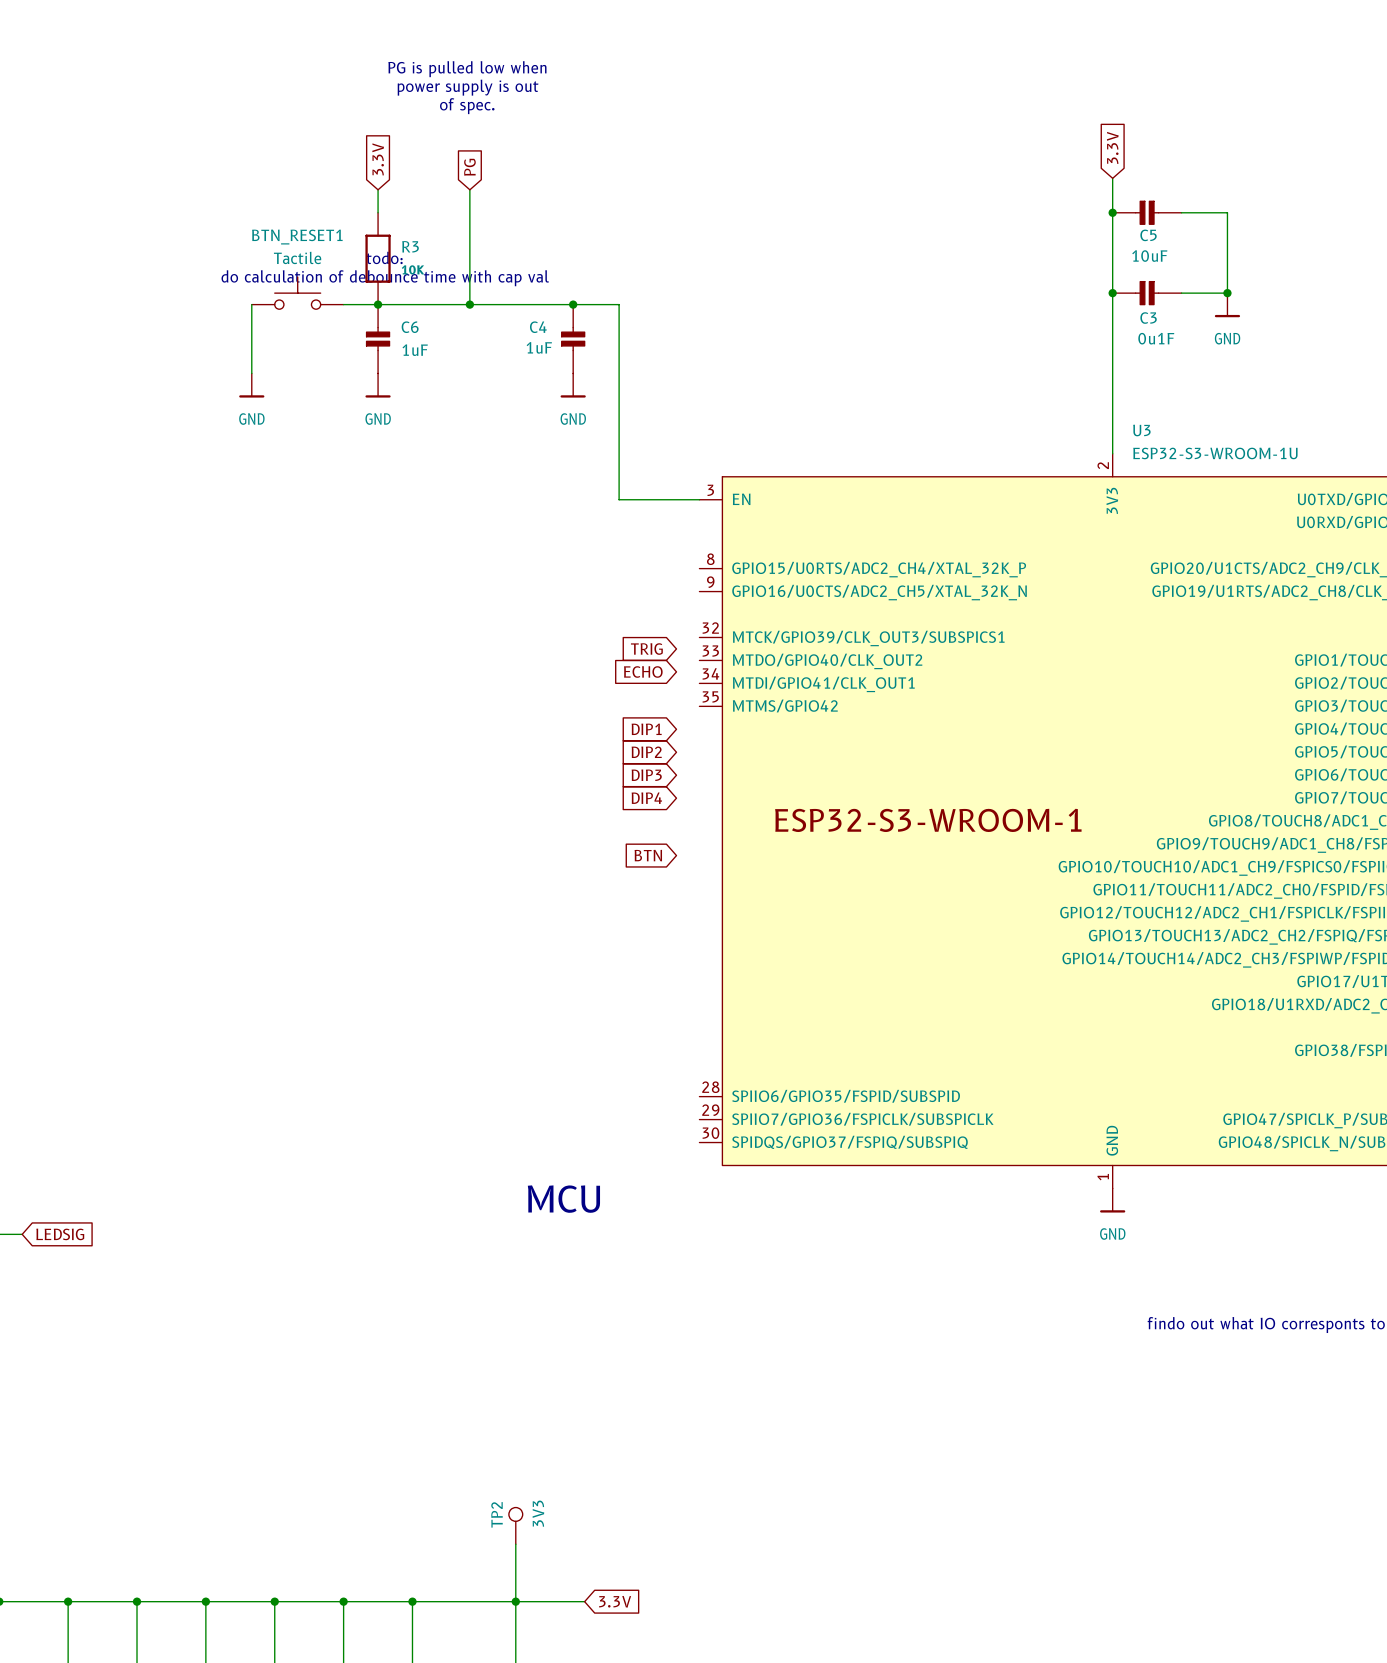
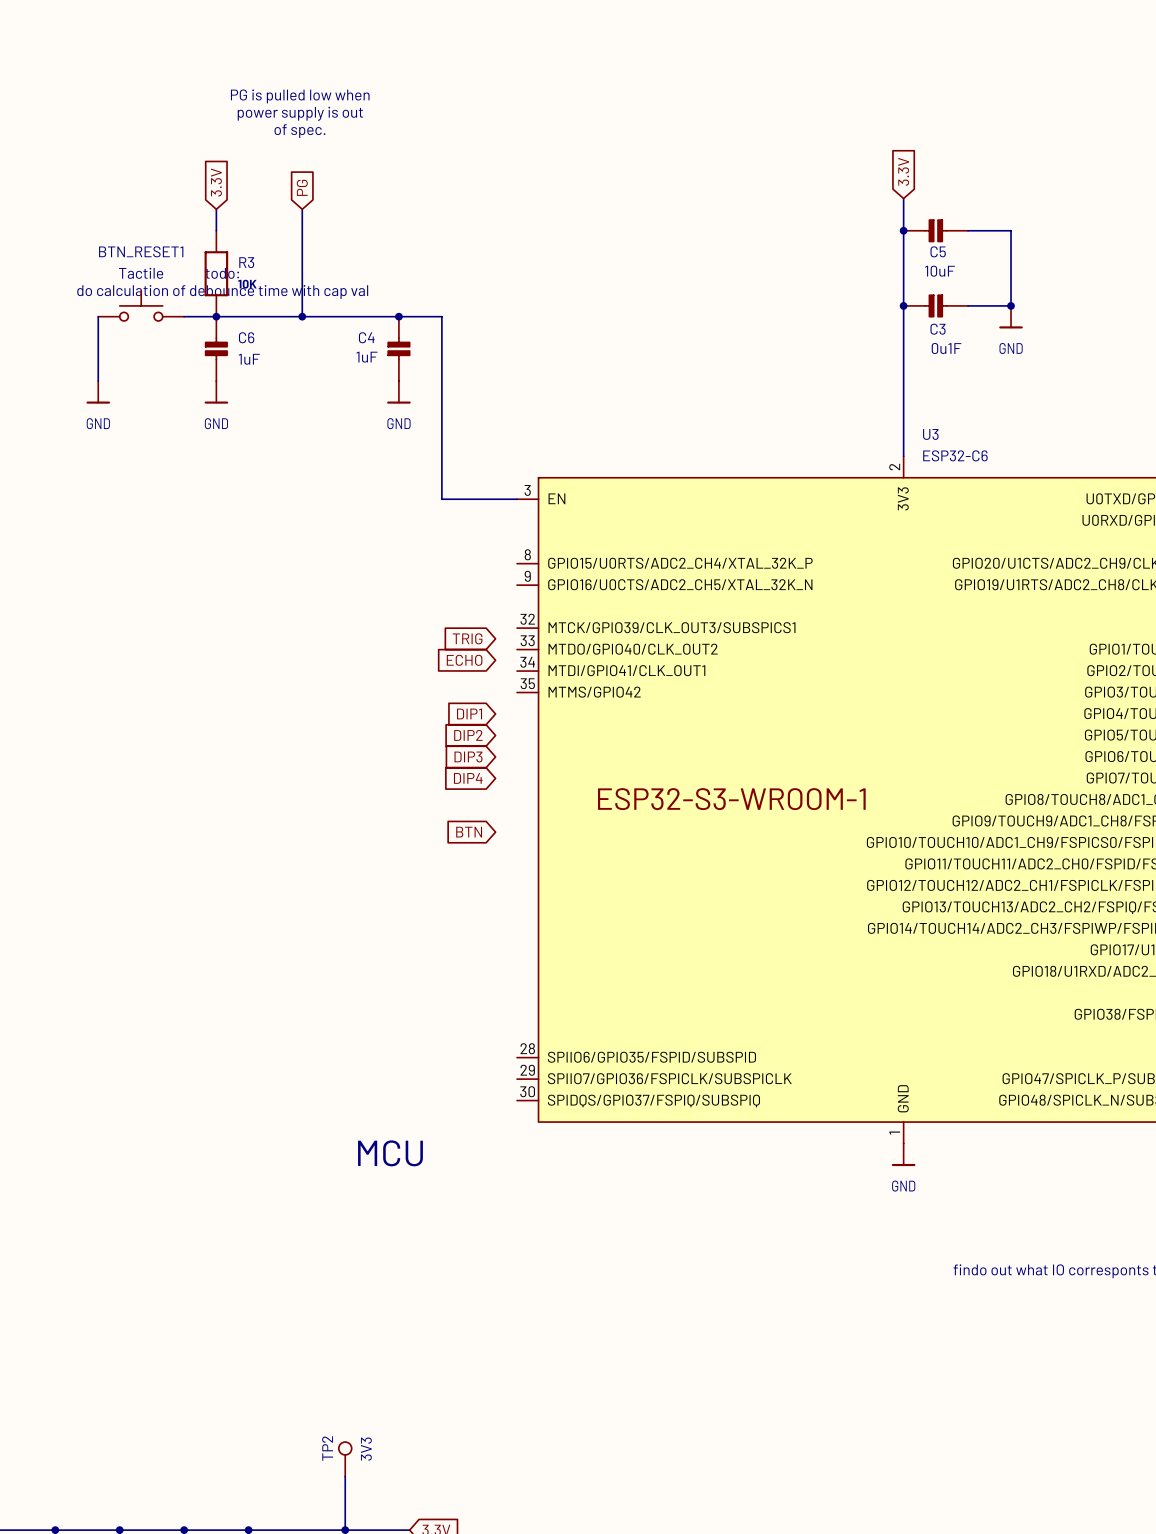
U3 value: ESP32-S3-WROOM-1U (1215, 453) -> ESP32-C6 (955, 455)

